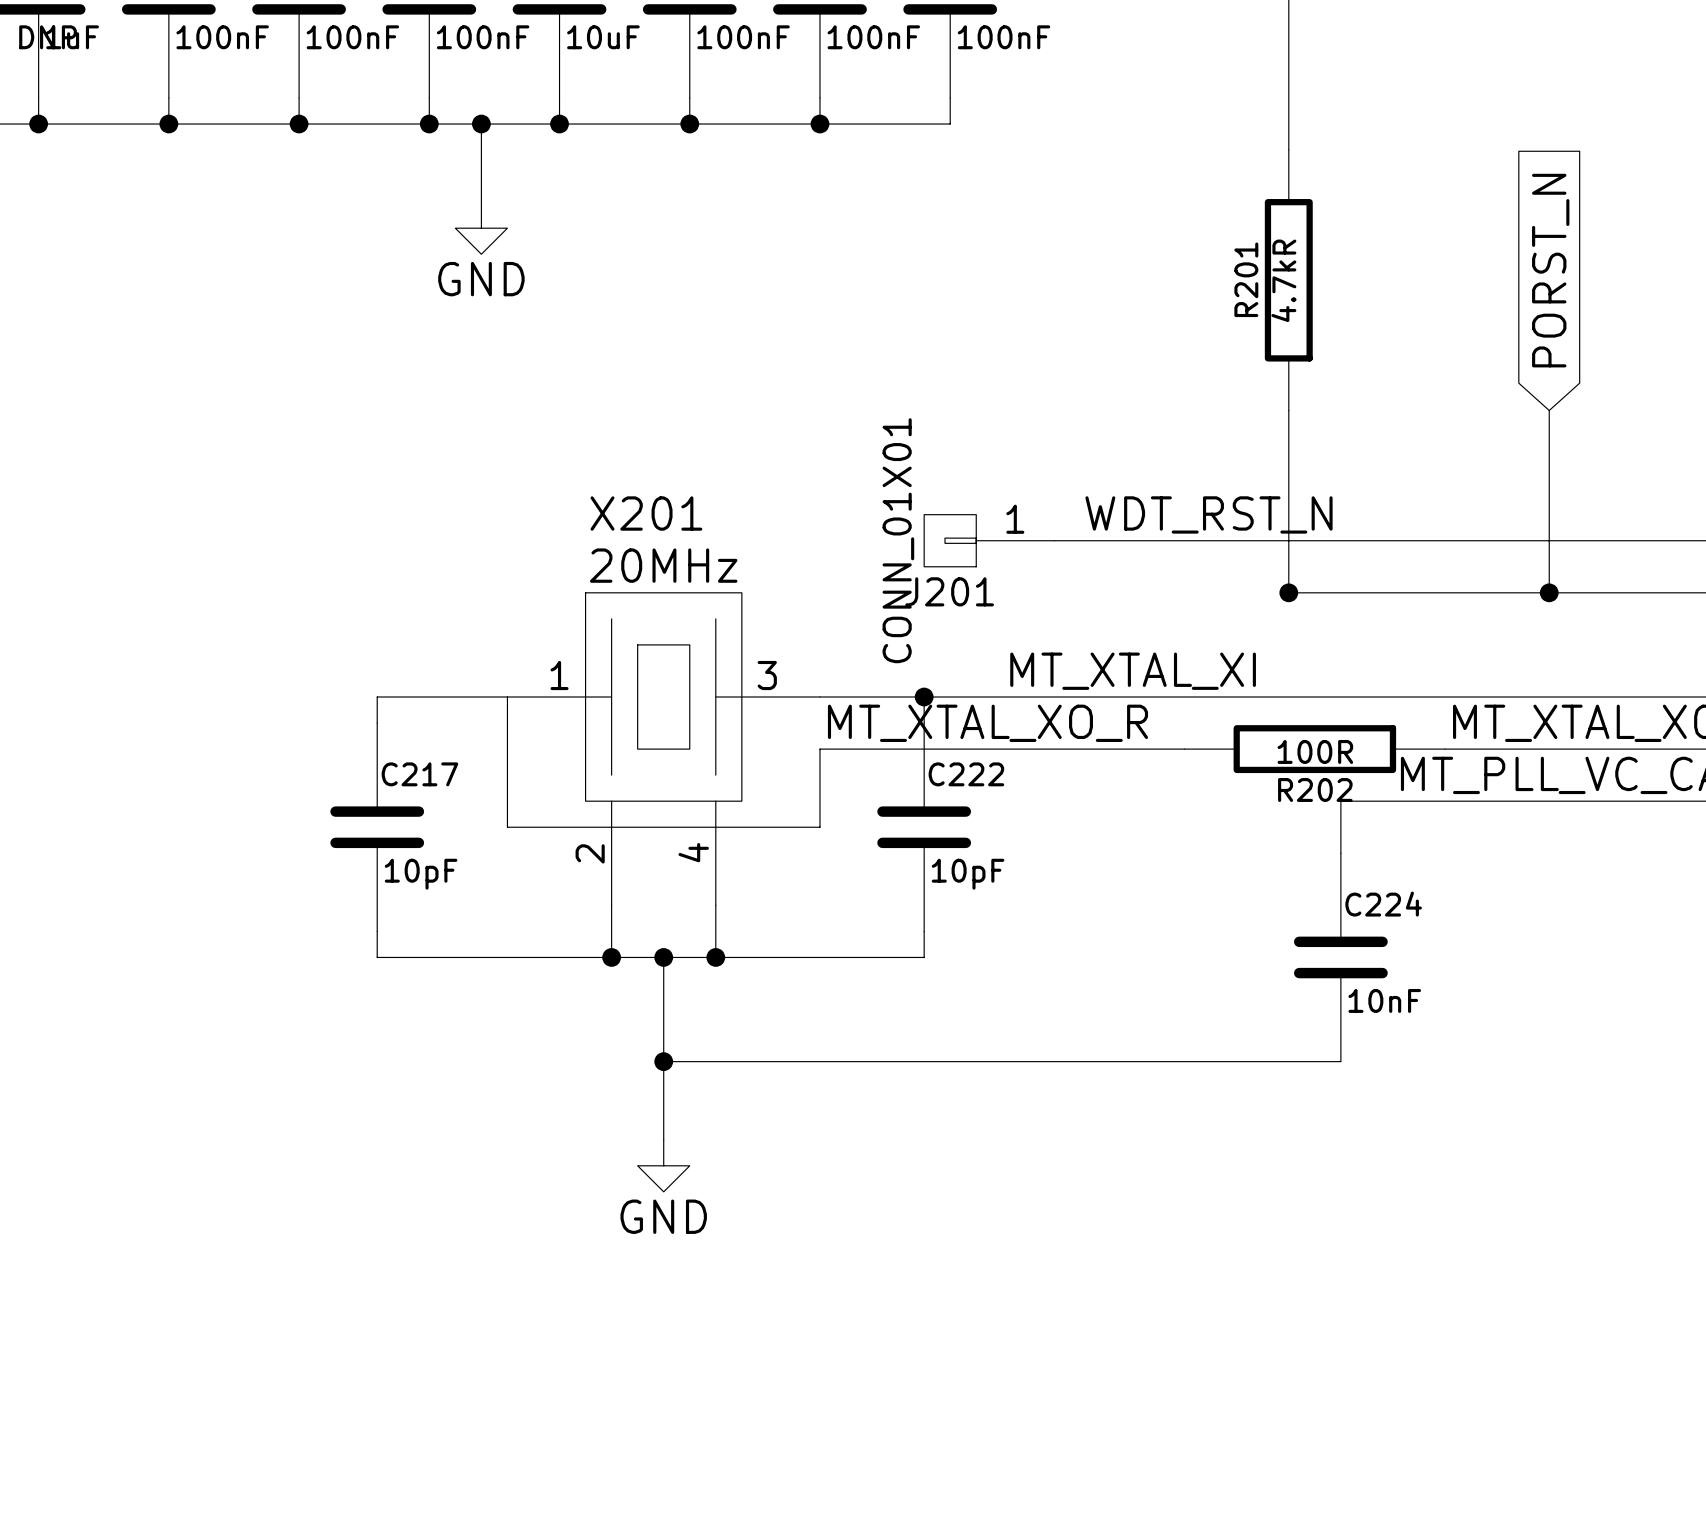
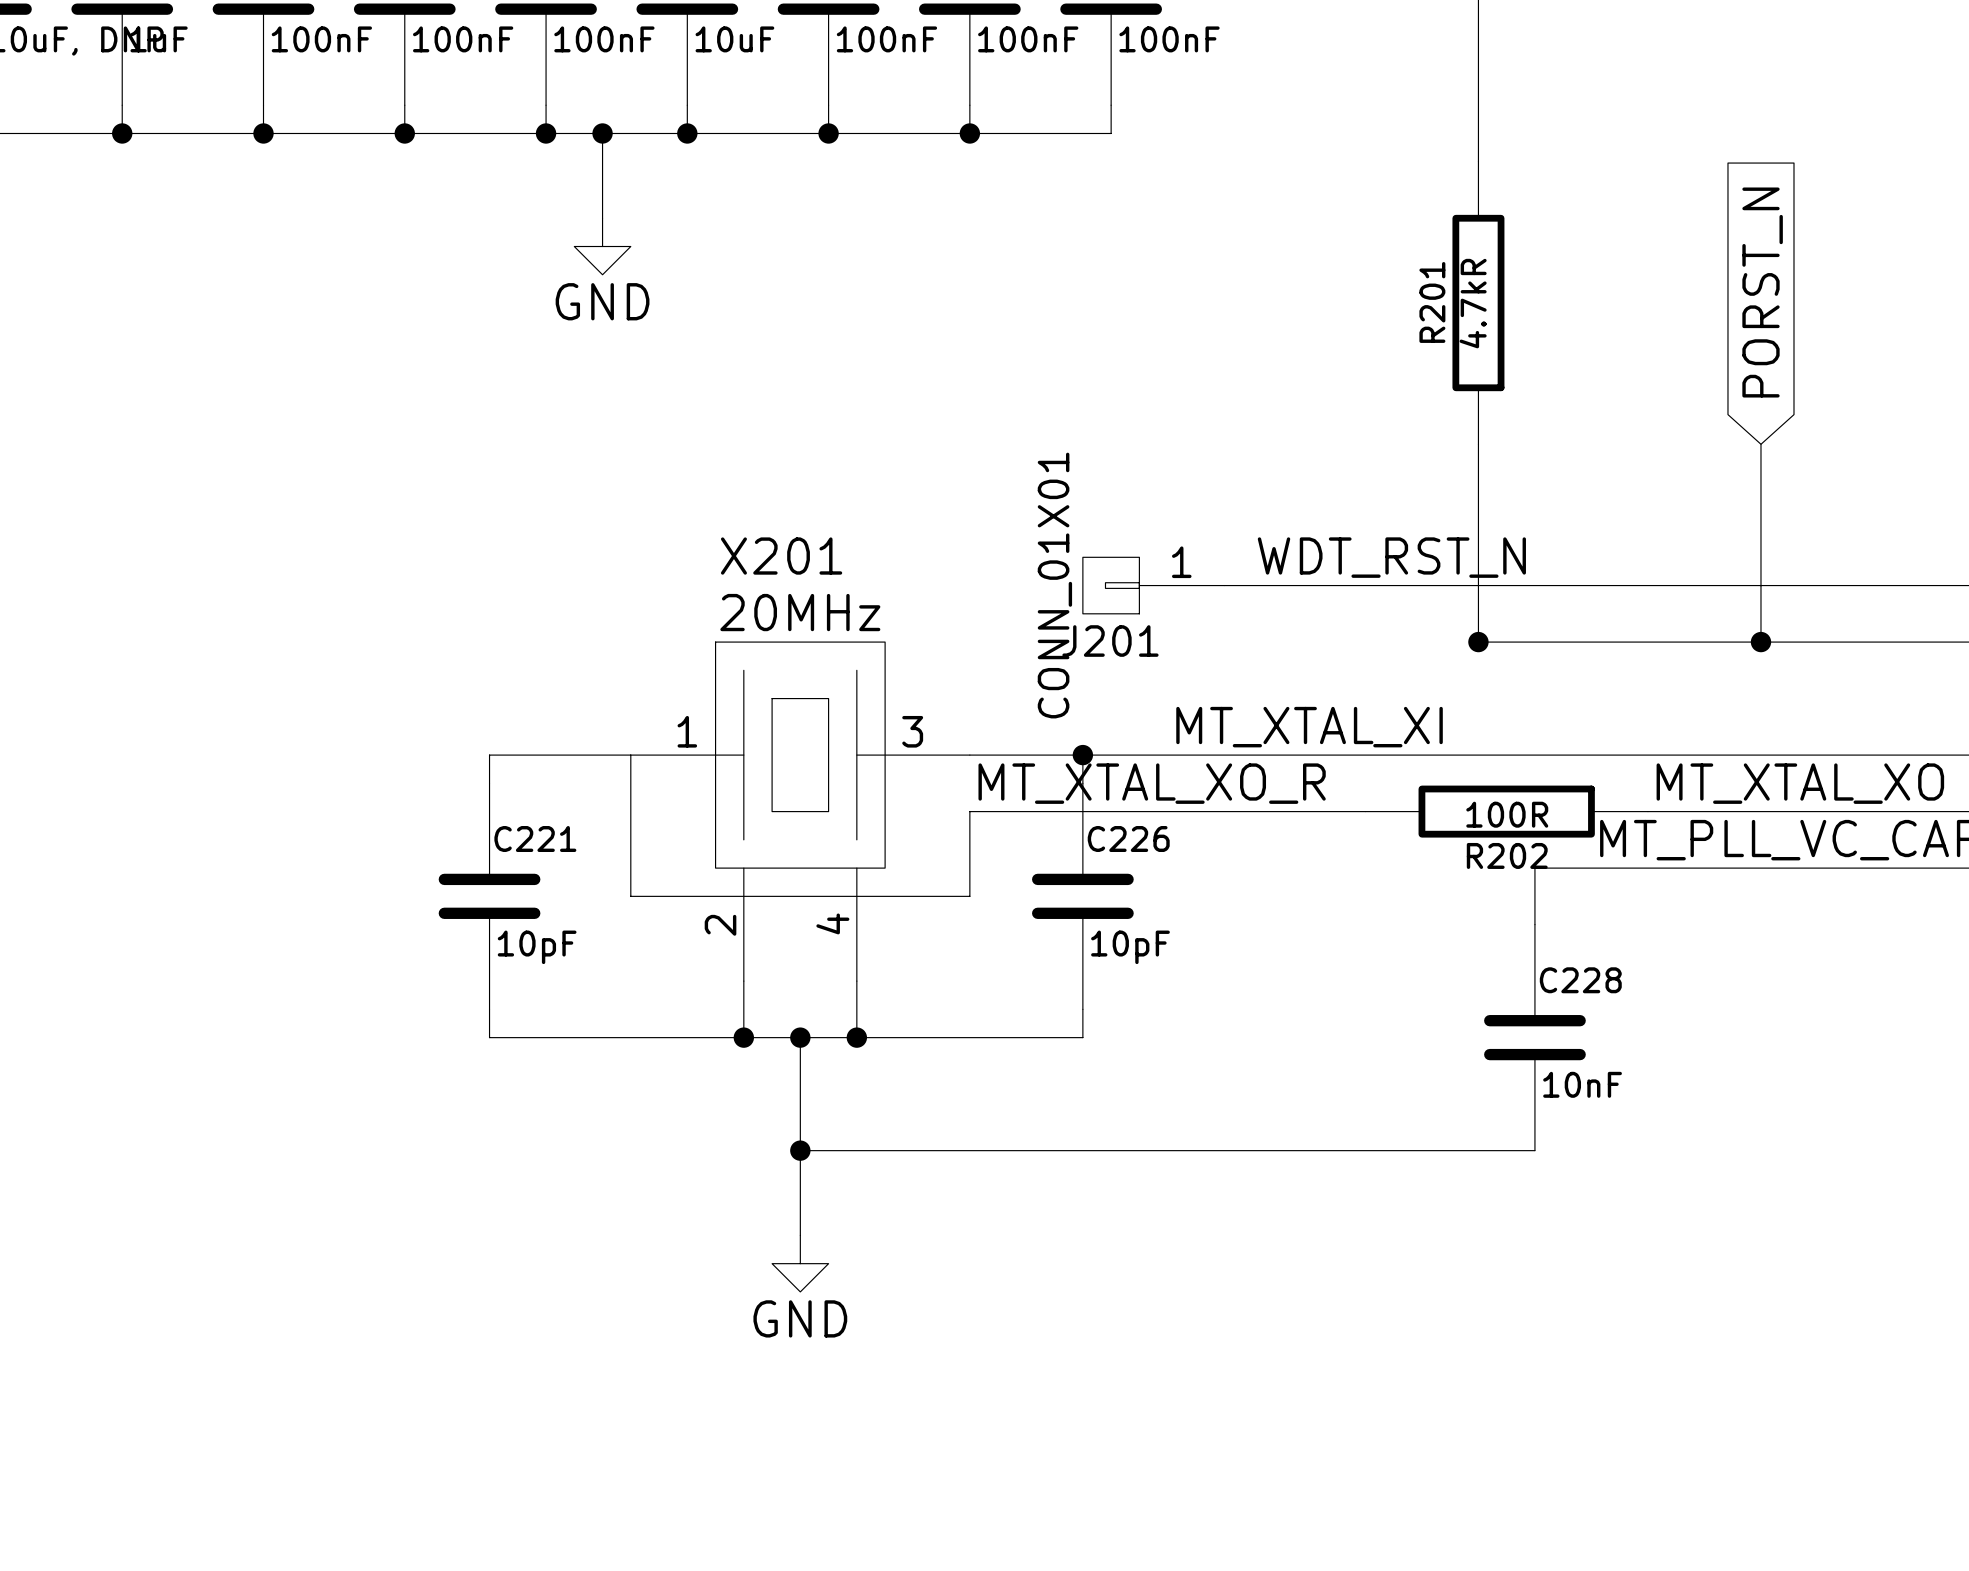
C217 name: C217 (419, 774) -> C221 (535, 839)
C222 name: C222 (966, 774) -> C226 (1128, 839)
C224 name: C224 (1383, 904) -> C228 (1580, 980)

